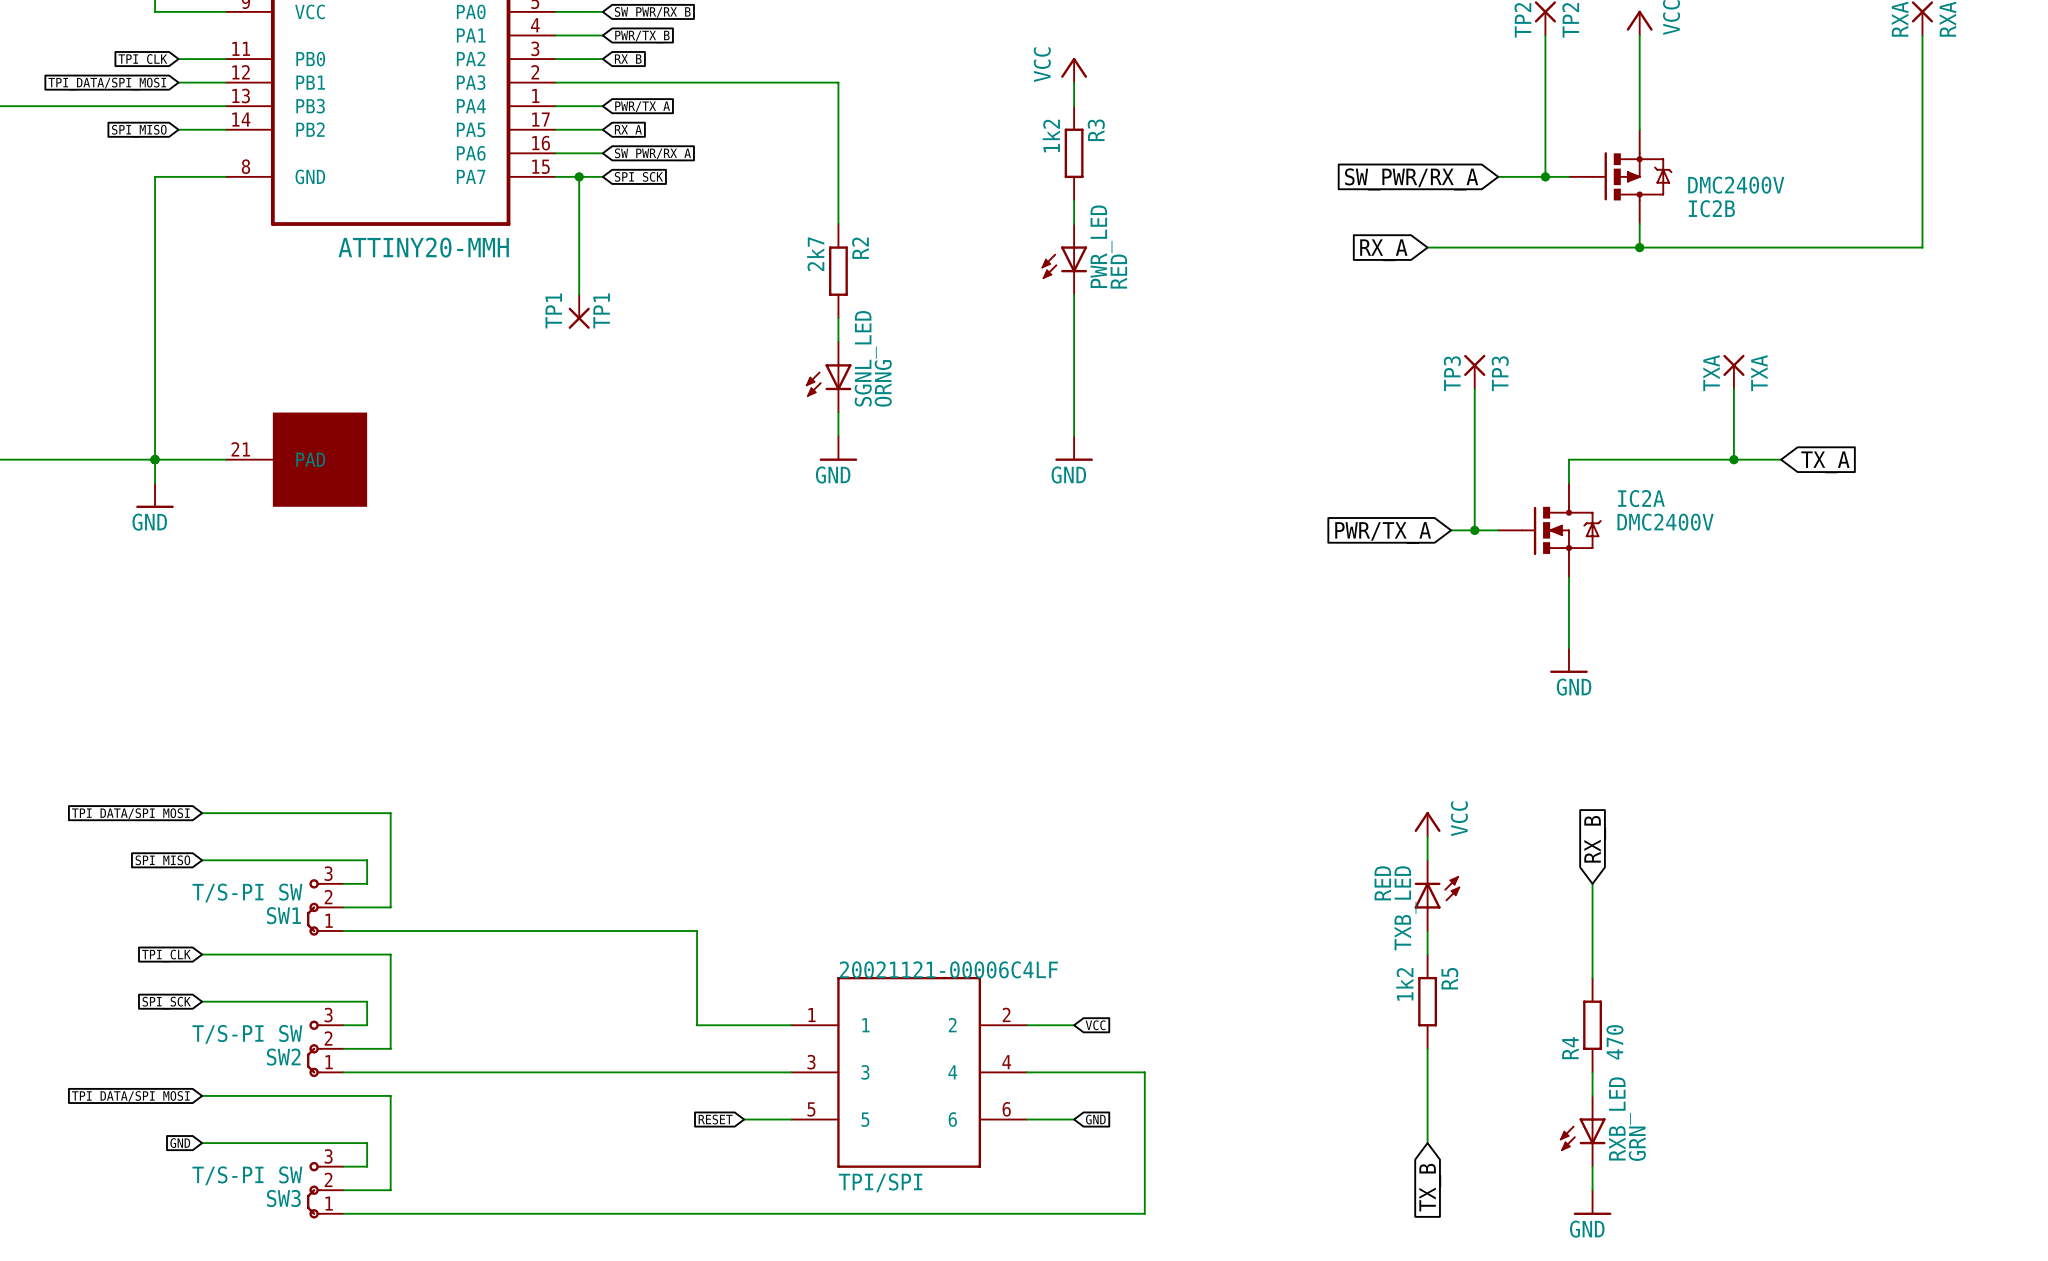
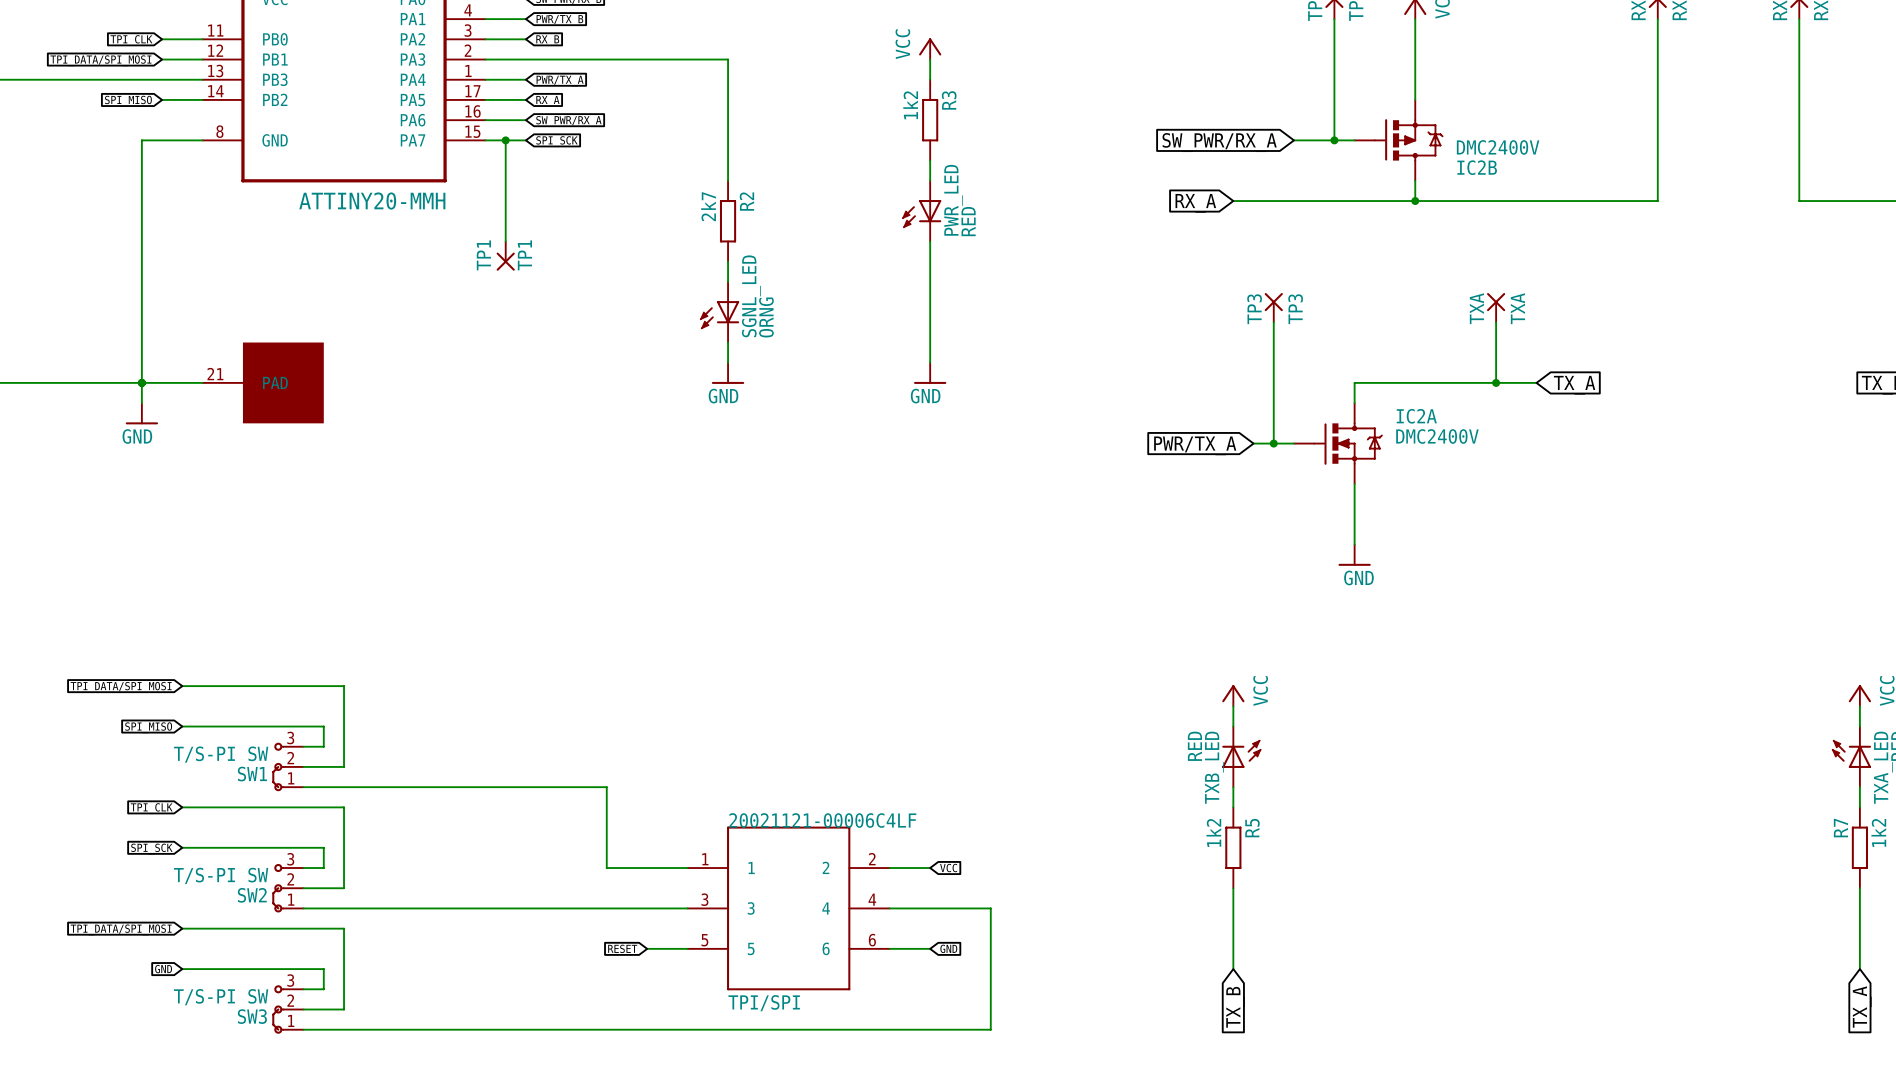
global label: RX_B (1595, 839) -> none
wire: (1592, 883) (1592, 978) -> none
R4: 470 (1592, 1025) -> none
wire: (1592, 1072) (1592, 1095) -> none
RXB_LED: GRN (1582, 1131) -> none
wire: (1592, 1166) (1592, 1190) -> none
power symbol: GND (1592, 1202) -> none

